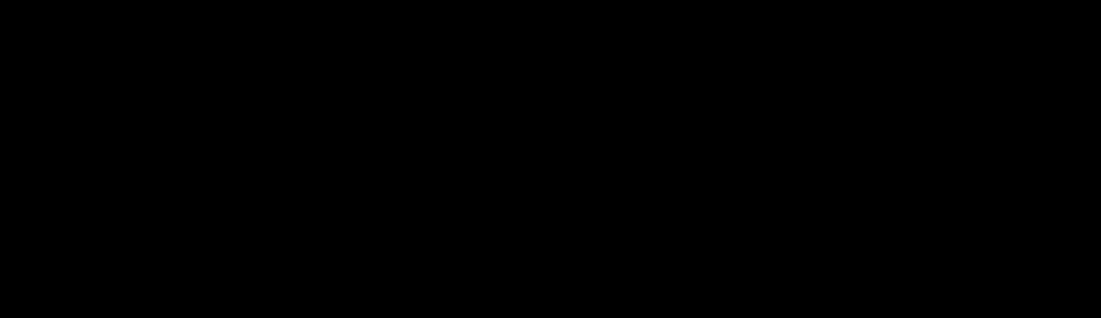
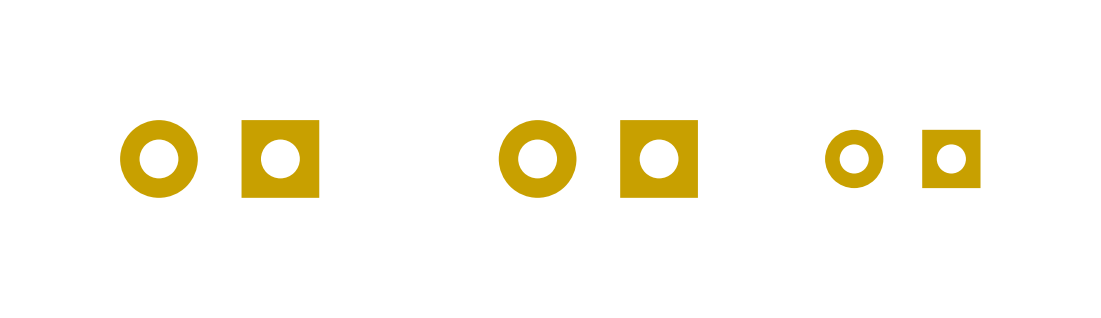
part: none -> (219, 158)
part: none -> (598, 158)
part: none -> (902, 158)

